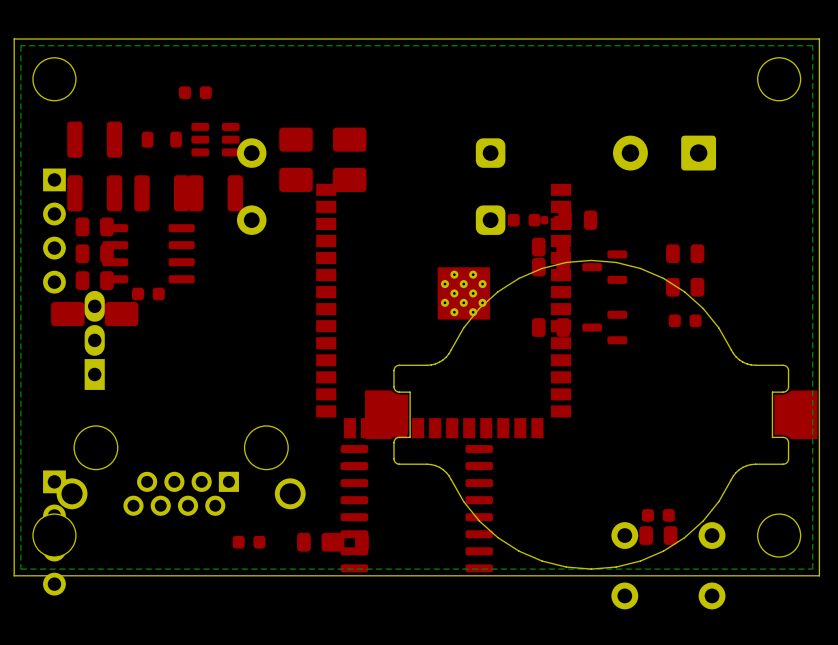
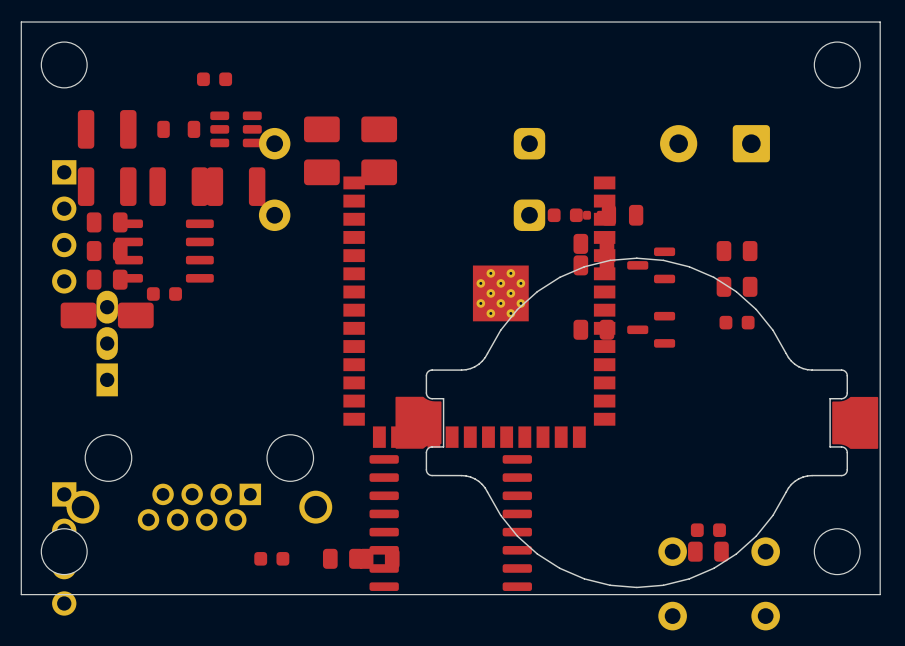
bottom zone outline: (812, 45) (20, 45) (20, 569) (812, 569) (812, 45) -> none

